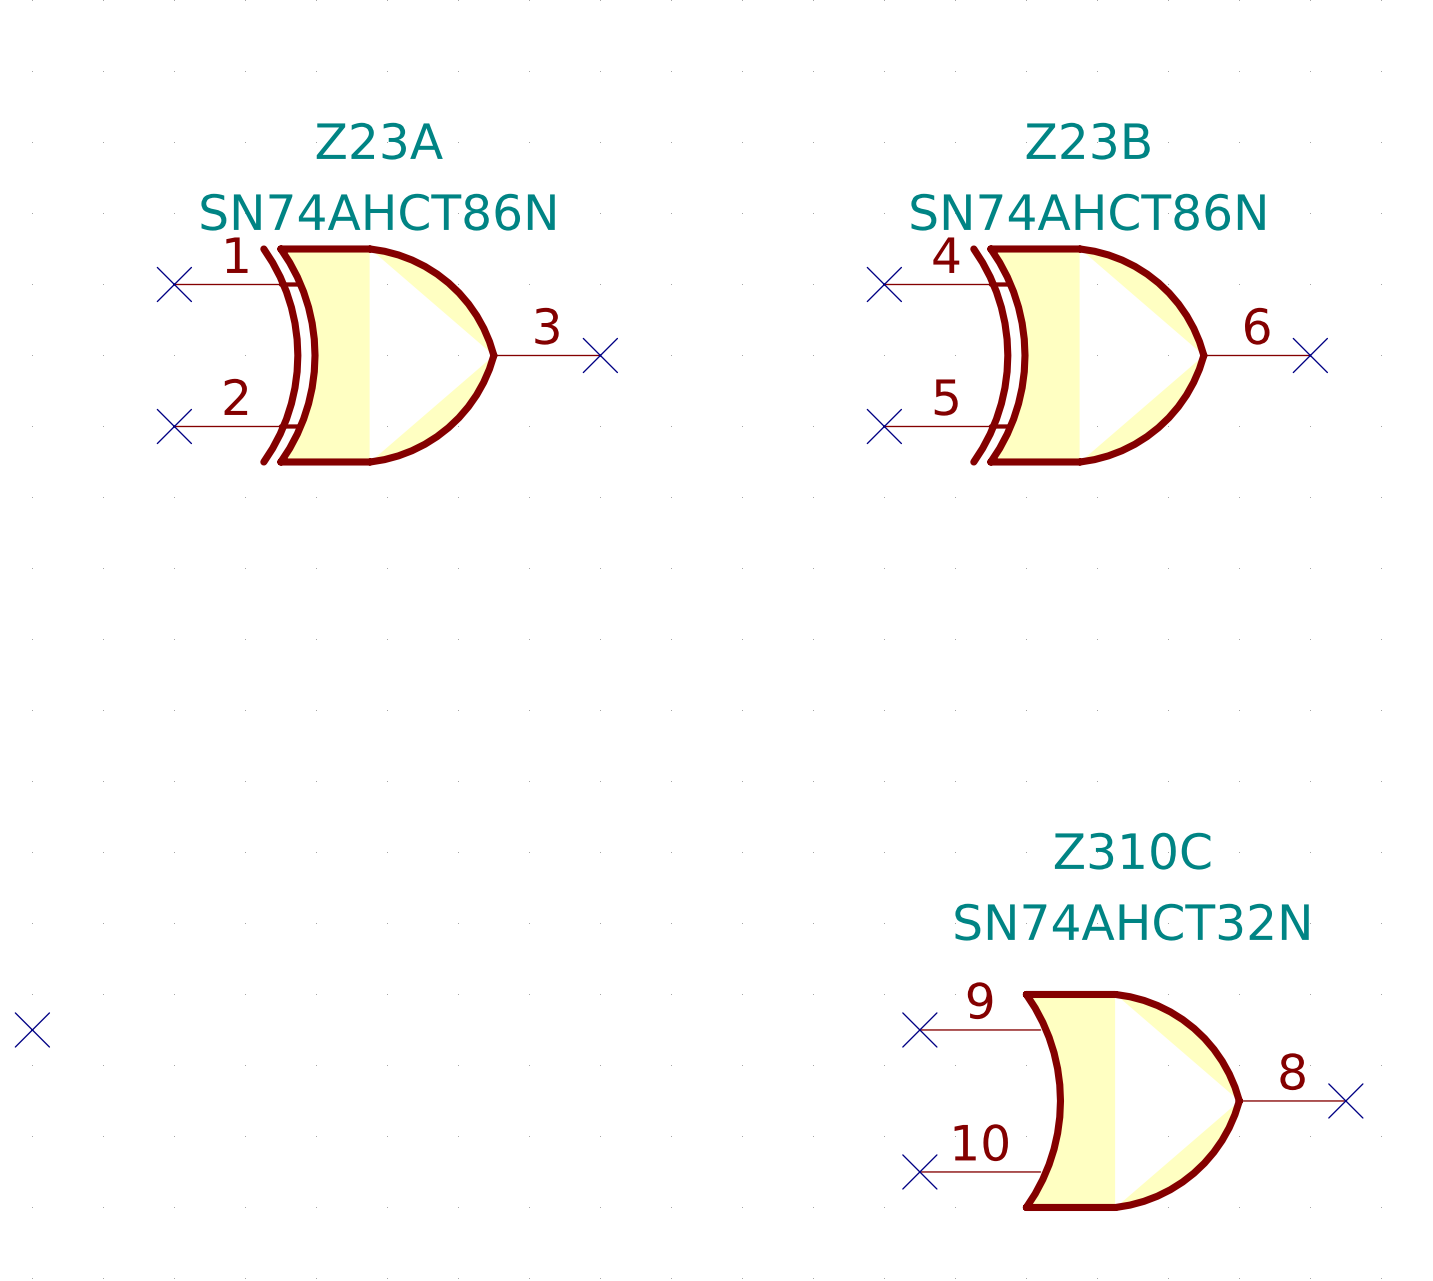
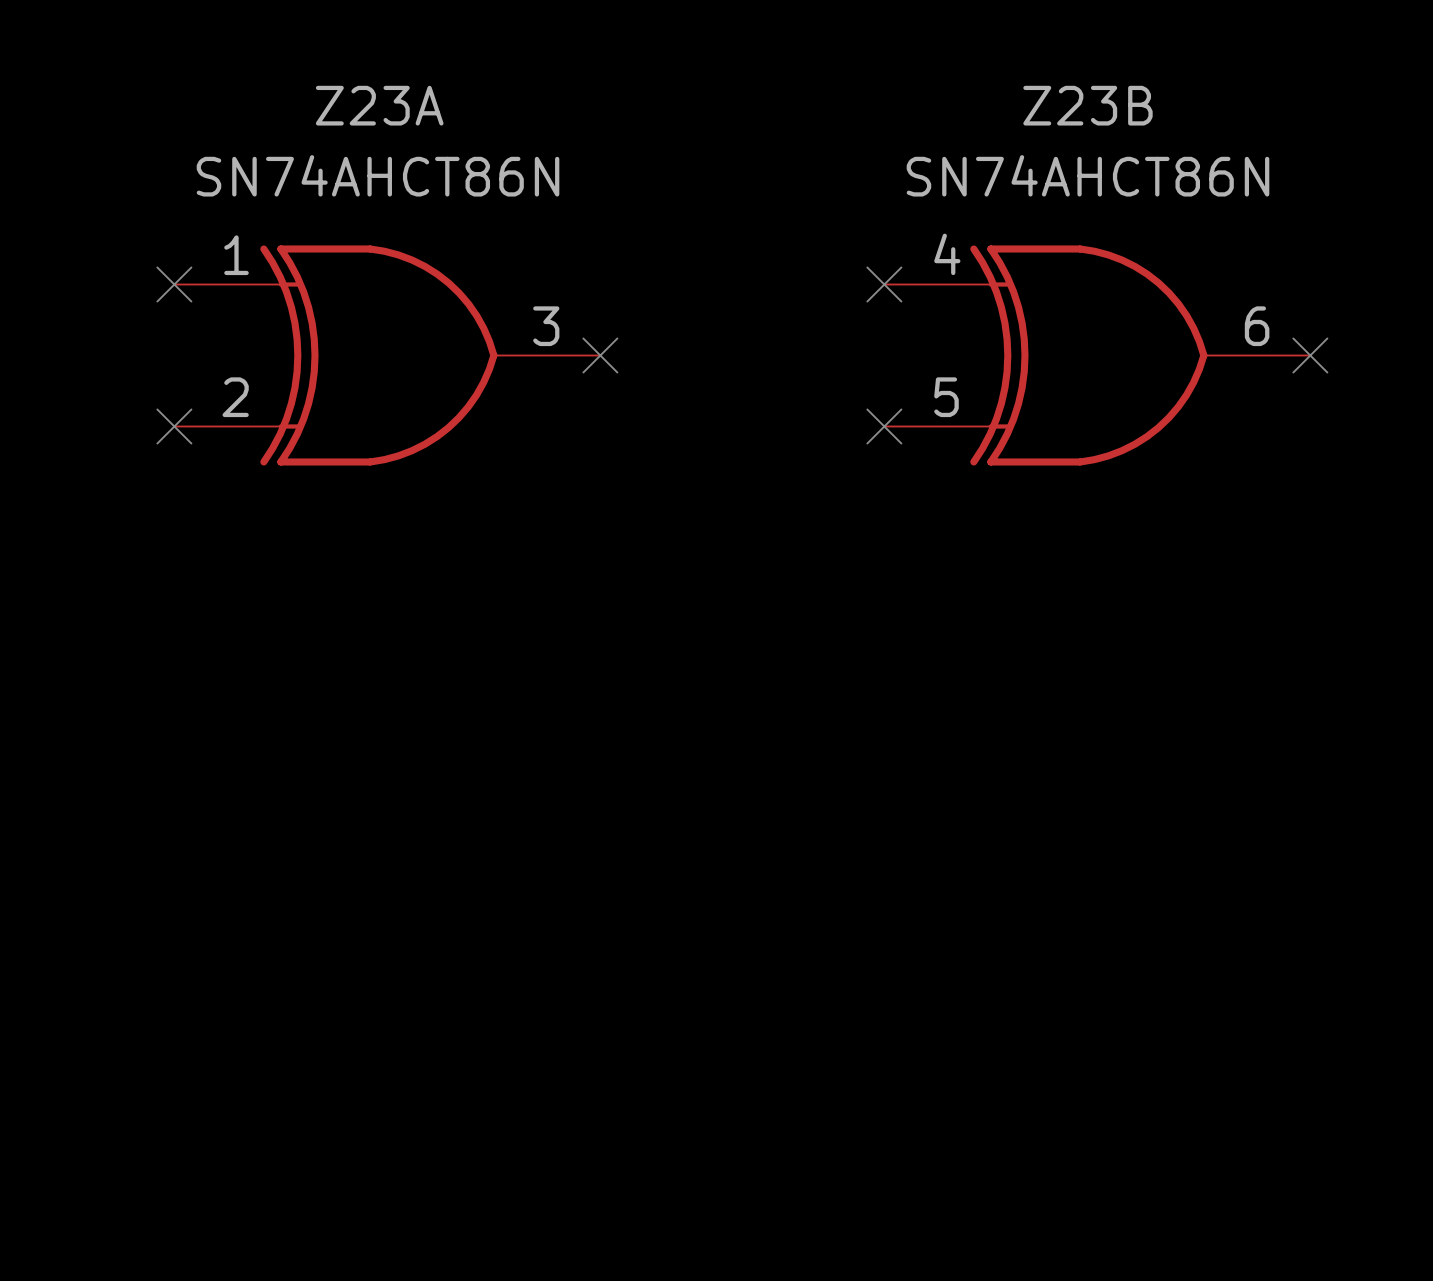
Z23A name position: Z23A (379, 141) -> Z23A (379, 105)
Z23B name position: Z23B (1088, 141) -> Z23B (1087, 105)
Z23A value position: SN74AHCT86N (378, 212) -> SN74AHCT86N (378, 175)
Z23B value position: SN74AHCT86N (1088, 212) -> SN74AHCT86N (1087, 175)
no-connect mark: (32, 1029) -> none
no-connect mark: (919, 1029) -> none
Z310C: SN74AHCT32N (1132, 1100) -> none
no-connect mark: (1345, 1100) -> none
no-connect mark: (919, 1171) -> none

